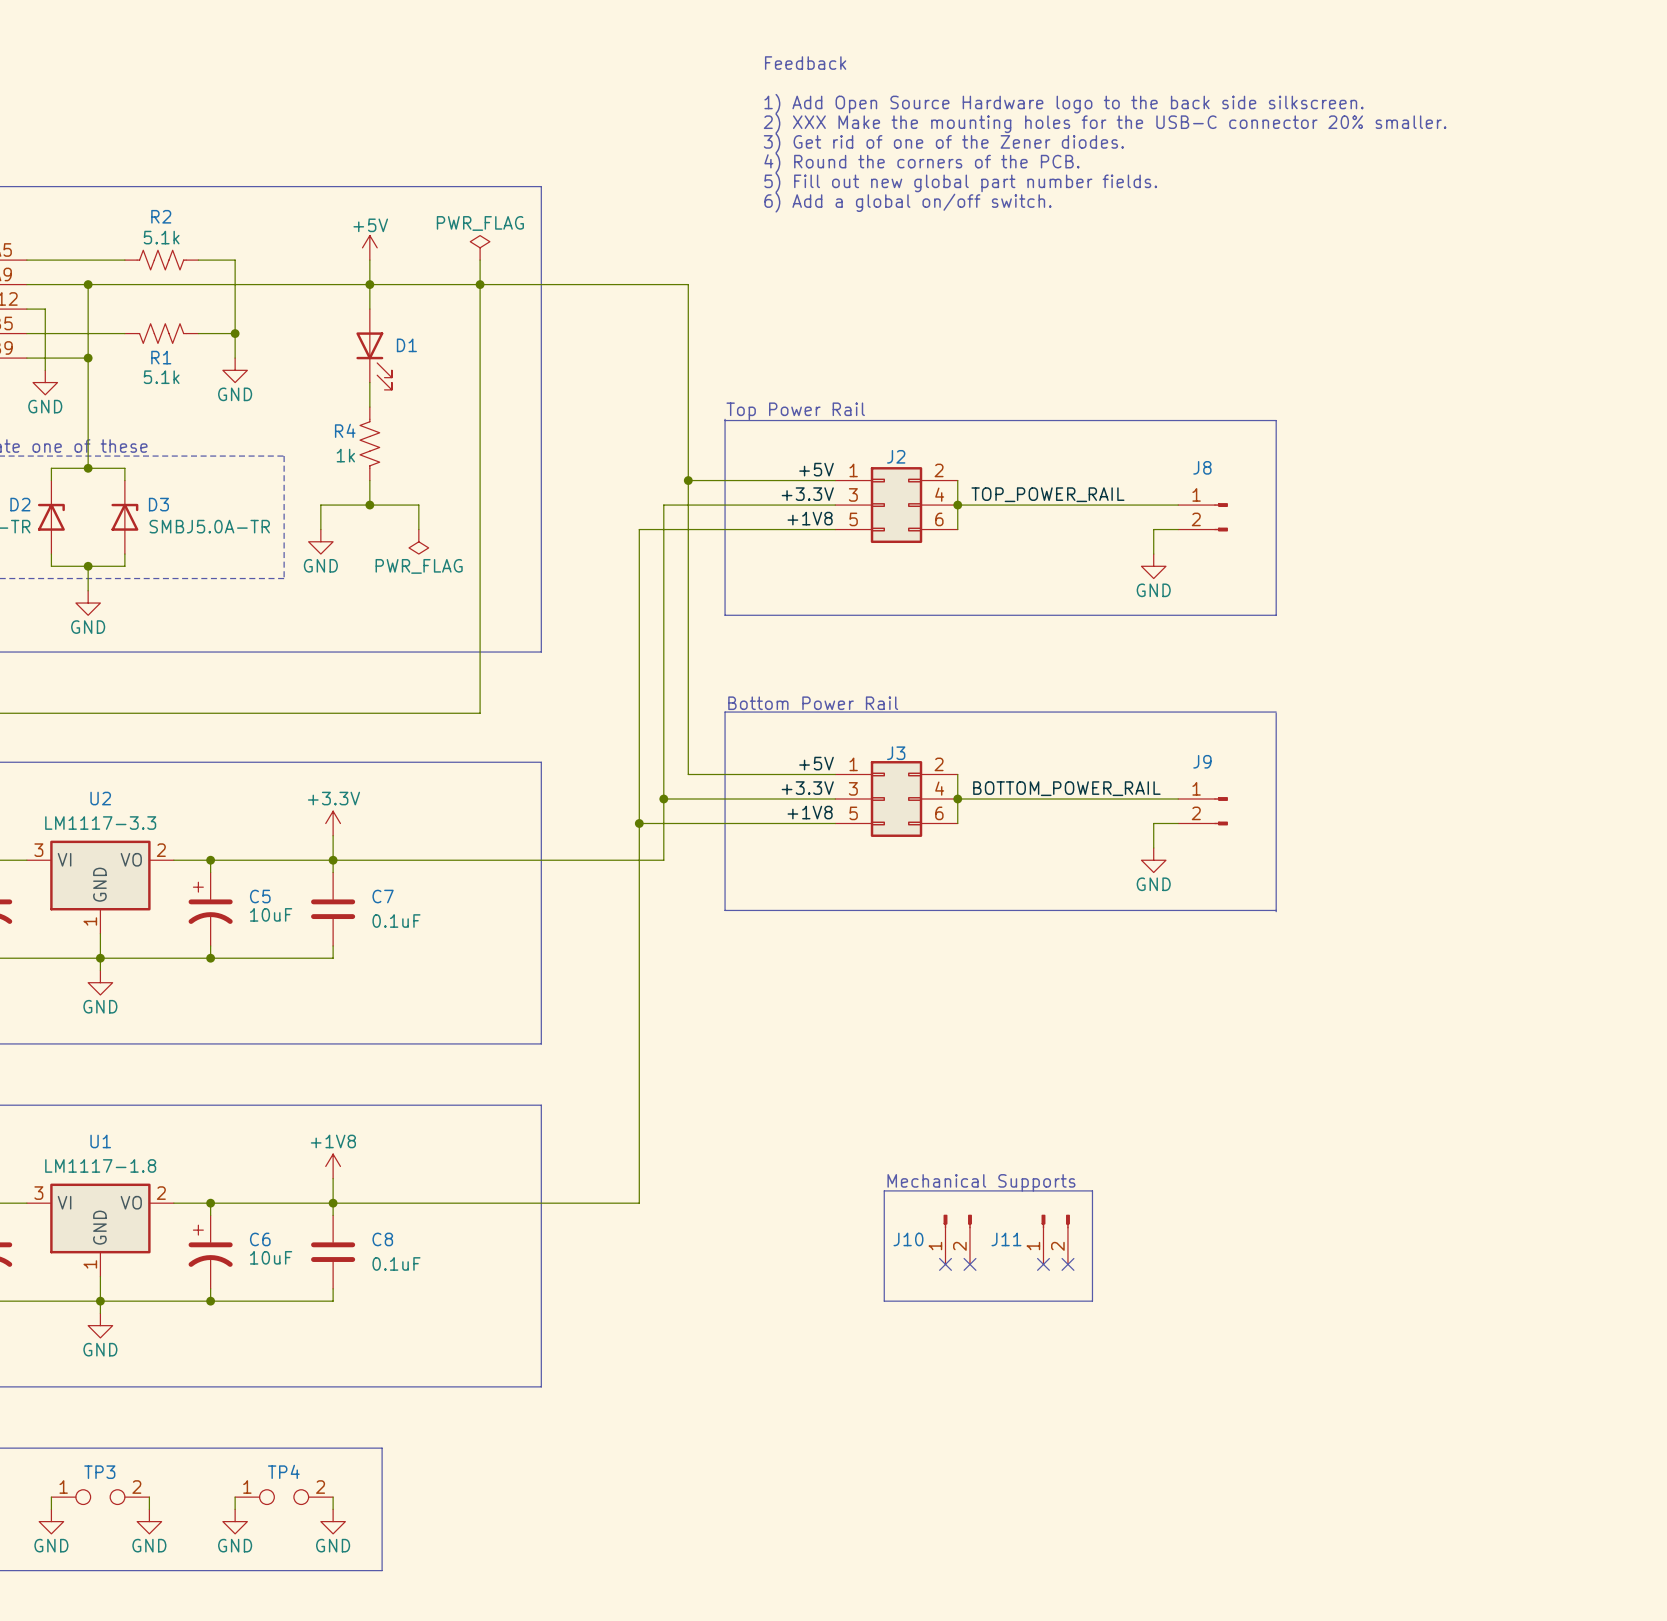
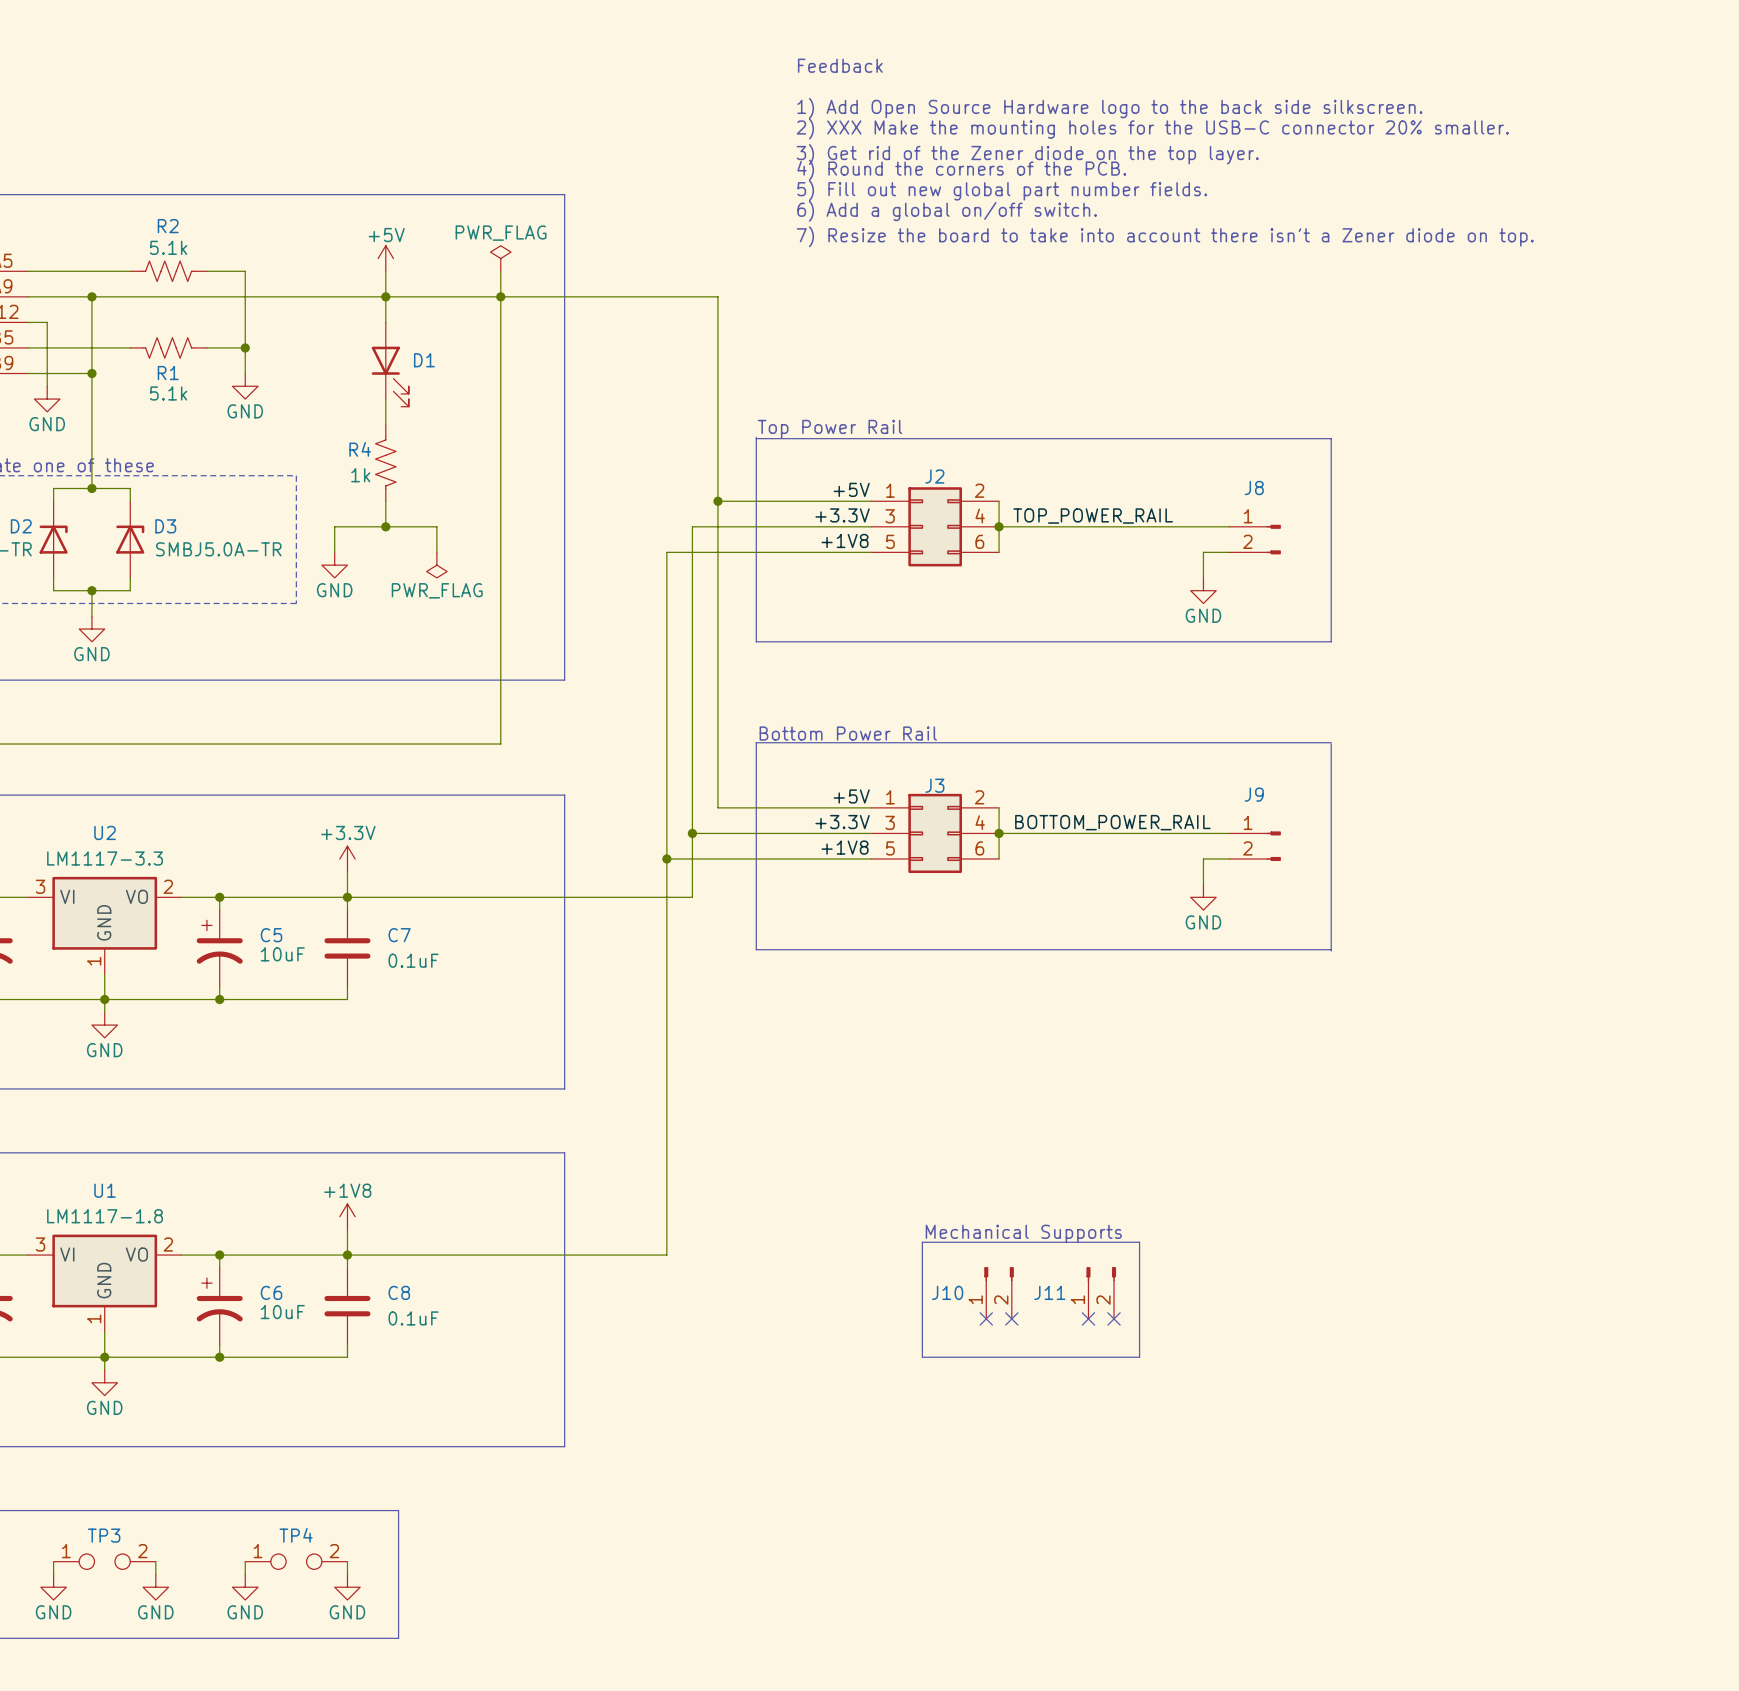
text: 3) Get rid of one of the Zener diodes. (943, 143) -> 3) Get rid of the Zener diode on the top layer. (1027, 154)
text: none -> 7) Resize the board to take into account there isn't a Zener diode on top. (1165, 236)

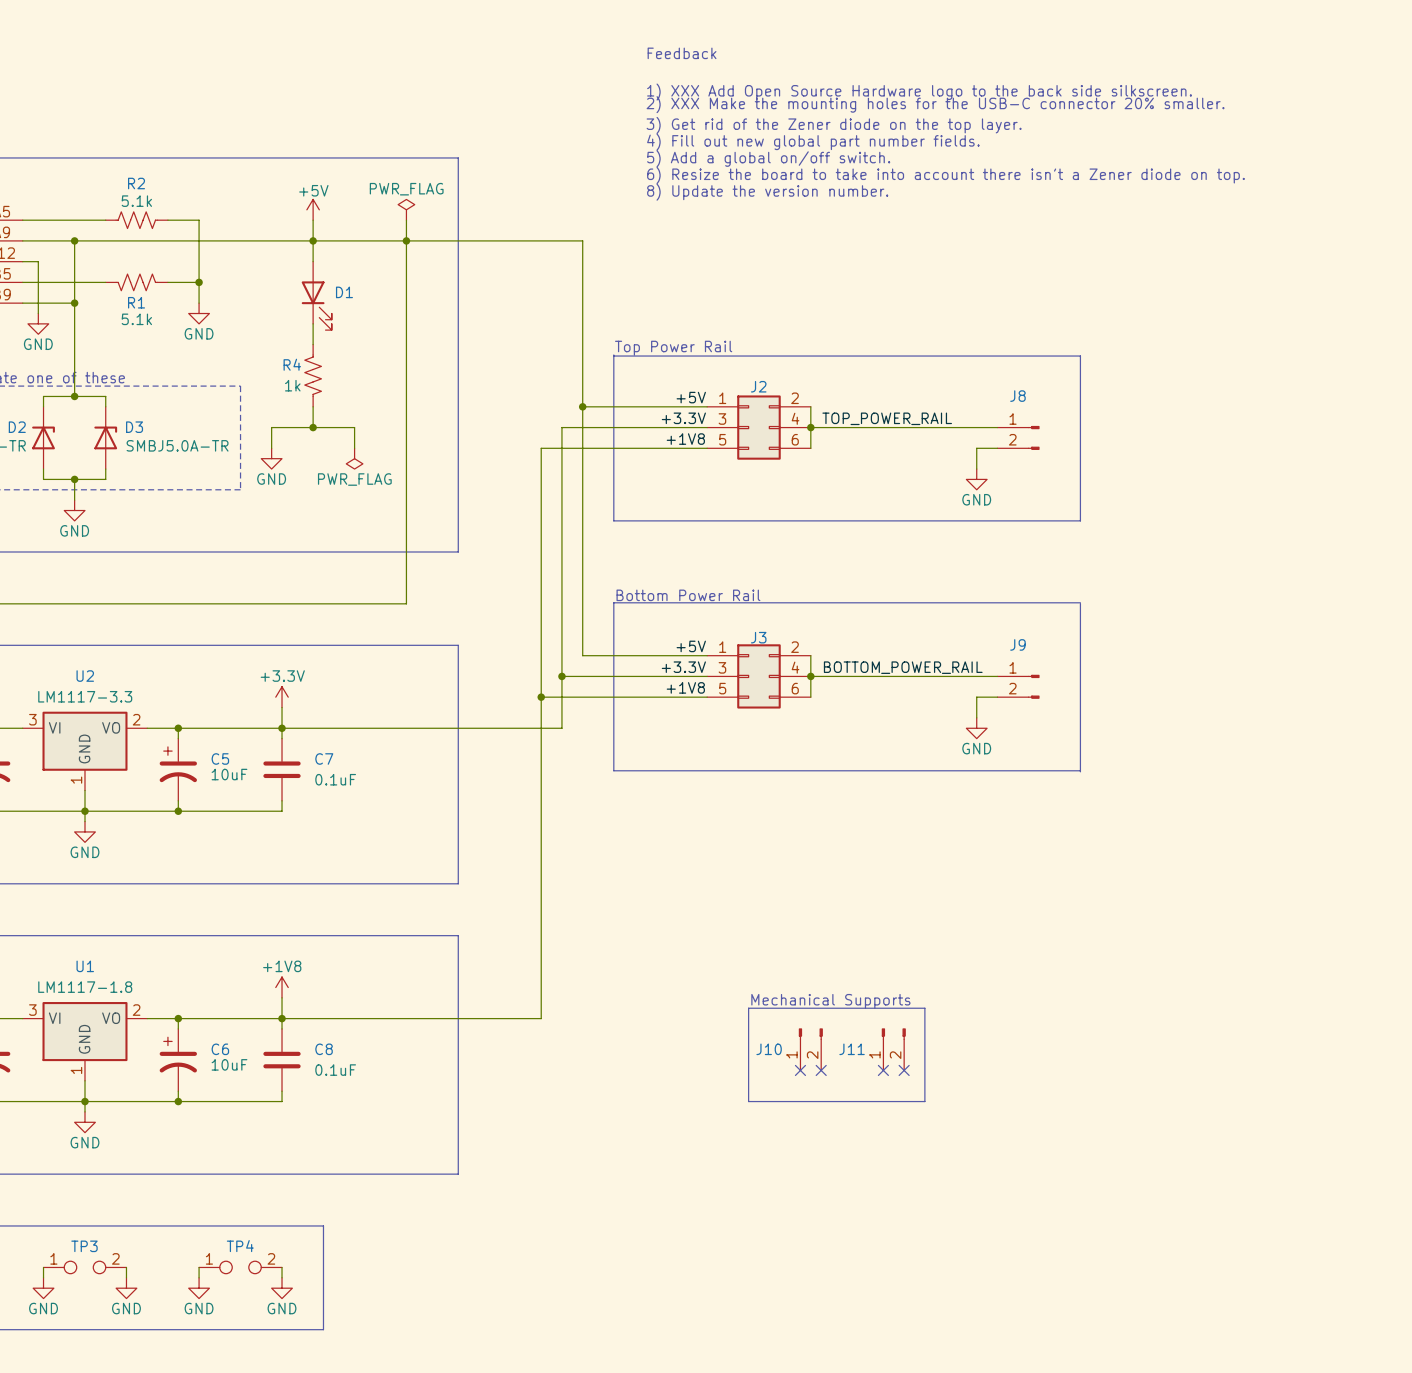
text: 1) Add Open Source Hardware logo to the back side silkscreen. (1109, 108) -> 1) XXX Add Open Source Hardware logo to the back side silkscreen. (919, 92)
text: 4) Round the corners of the PCB. (961, 170) -> 4) Fill out new global part number fields. (813, 142)
text: 5) Fill out new global part number fields. (1002, 190) -> 5) Add a global on/off switch. (768, 158)
text: 6) Add a global on/off switch. (947, 211) -> 6) Resize the board to take into account there isn't a Zener diode on top. (945, 175)
text: 7) Resize the board to take into account there isn't a Zener diode on top. (1165, 236) -> 8) Update the version number. (767, 192)

